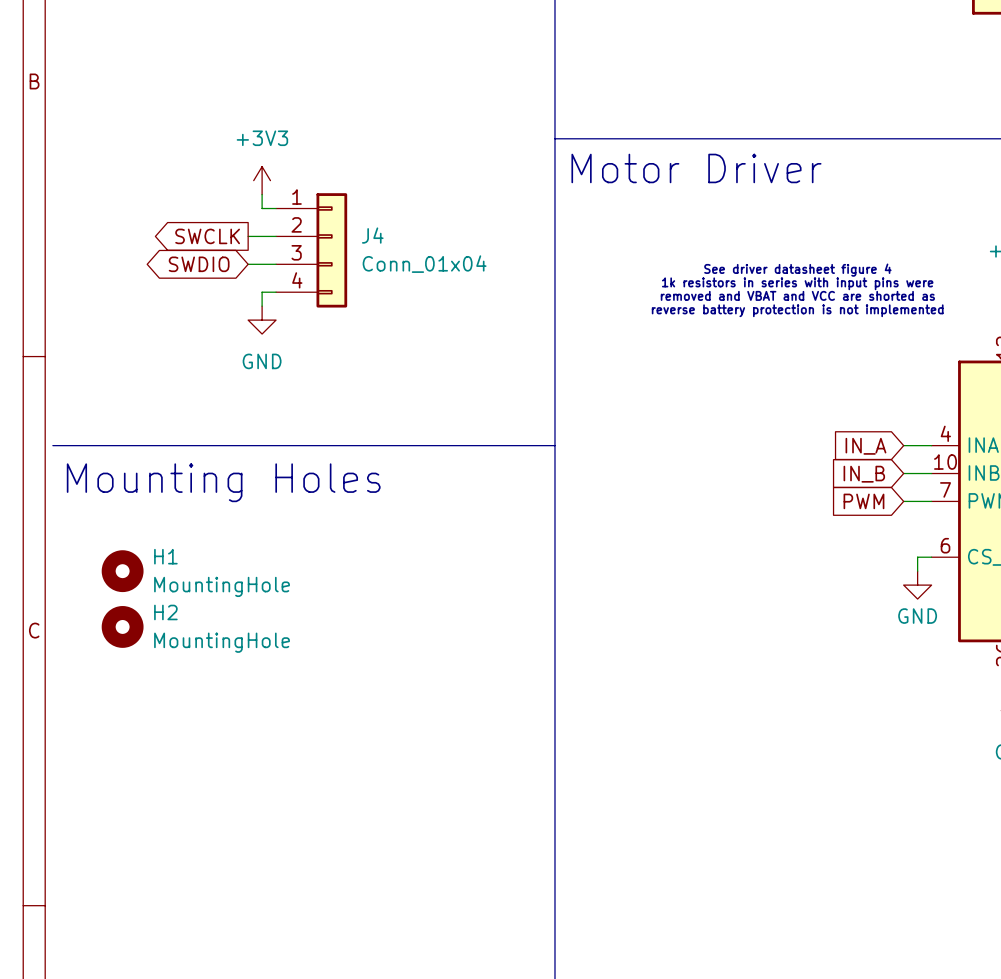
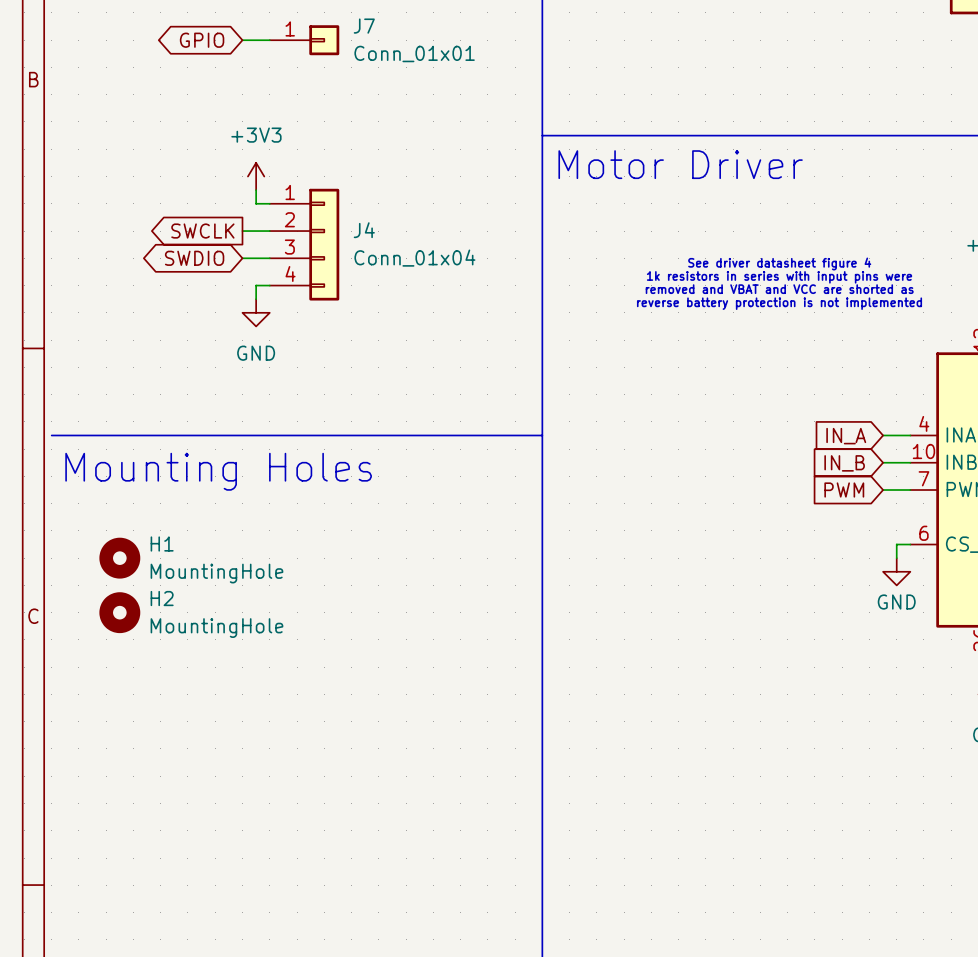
global label: none -> GPIO (202, 40)
wire: none -> (242, 40) (269, 40)
J7: none -> Conn_01x01 (304, 40)

